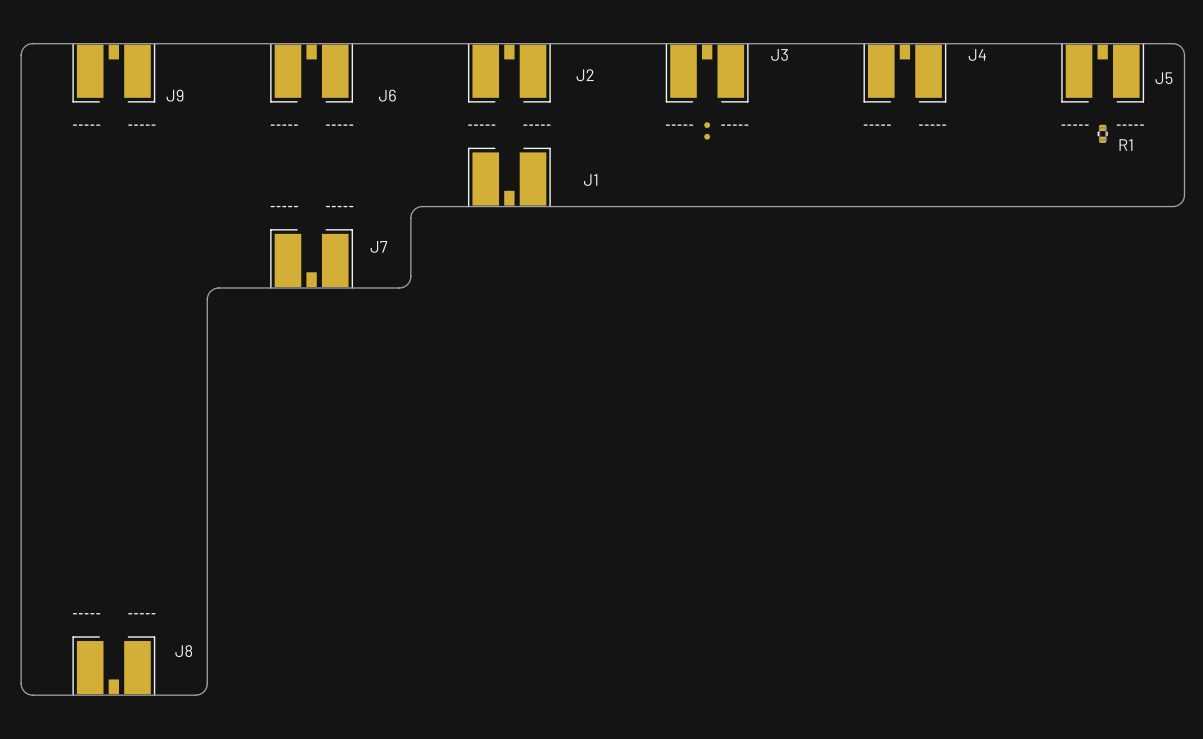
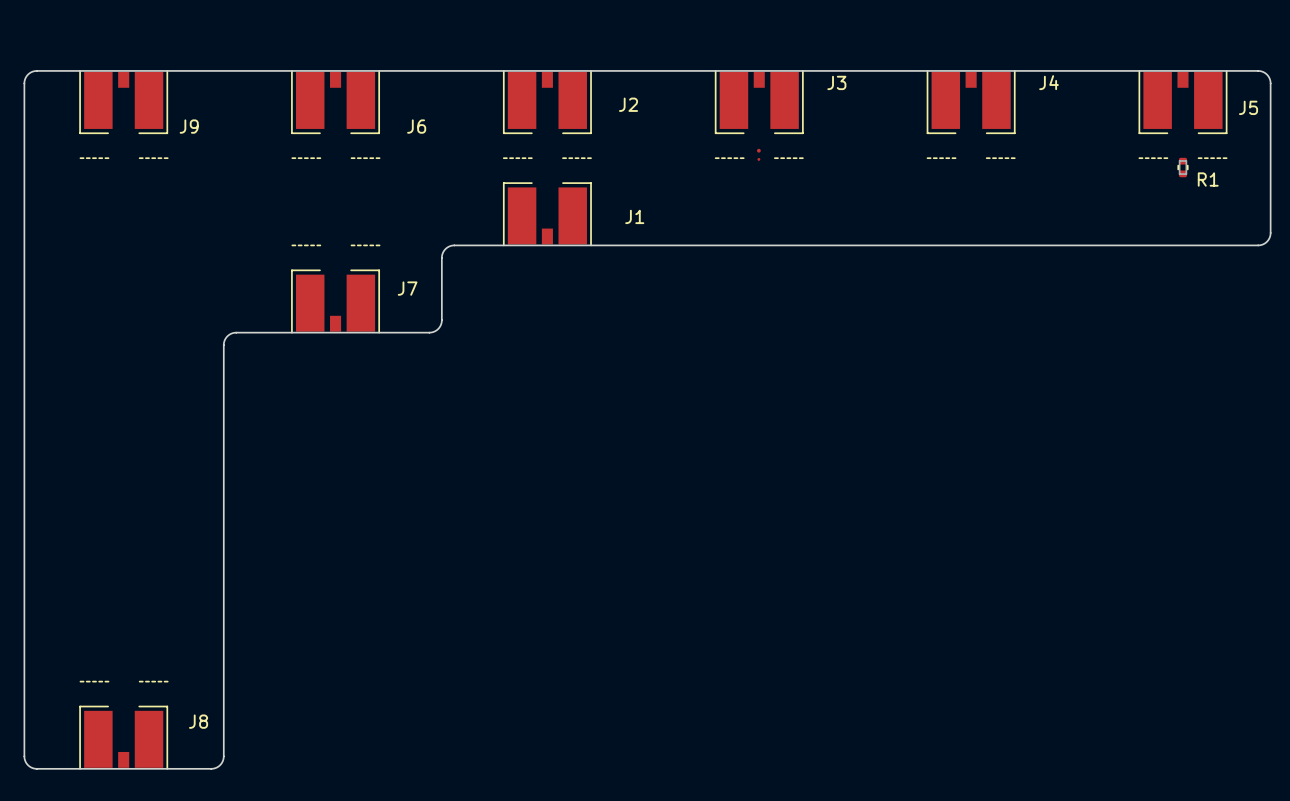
part footprint: [704, 122, 711, 140] -> [757, 148, 761, 161]

